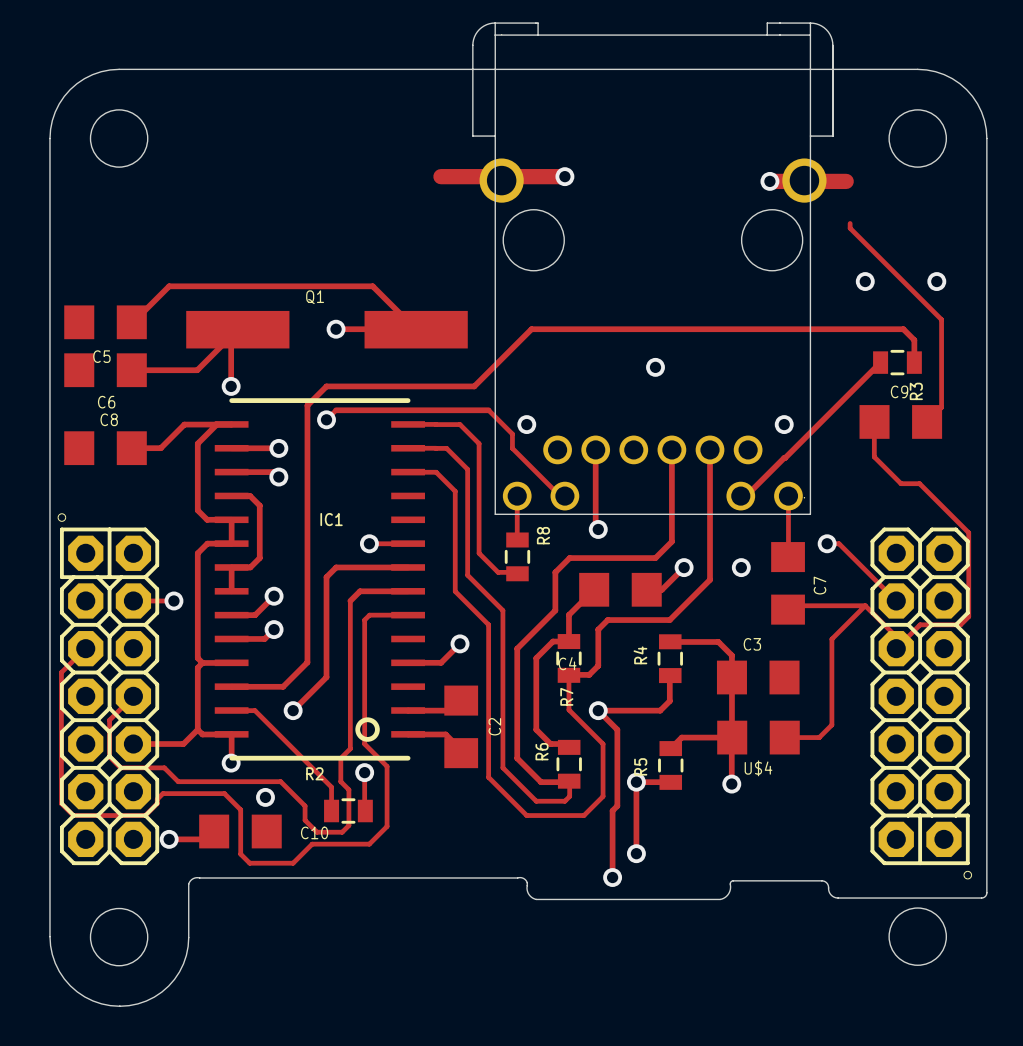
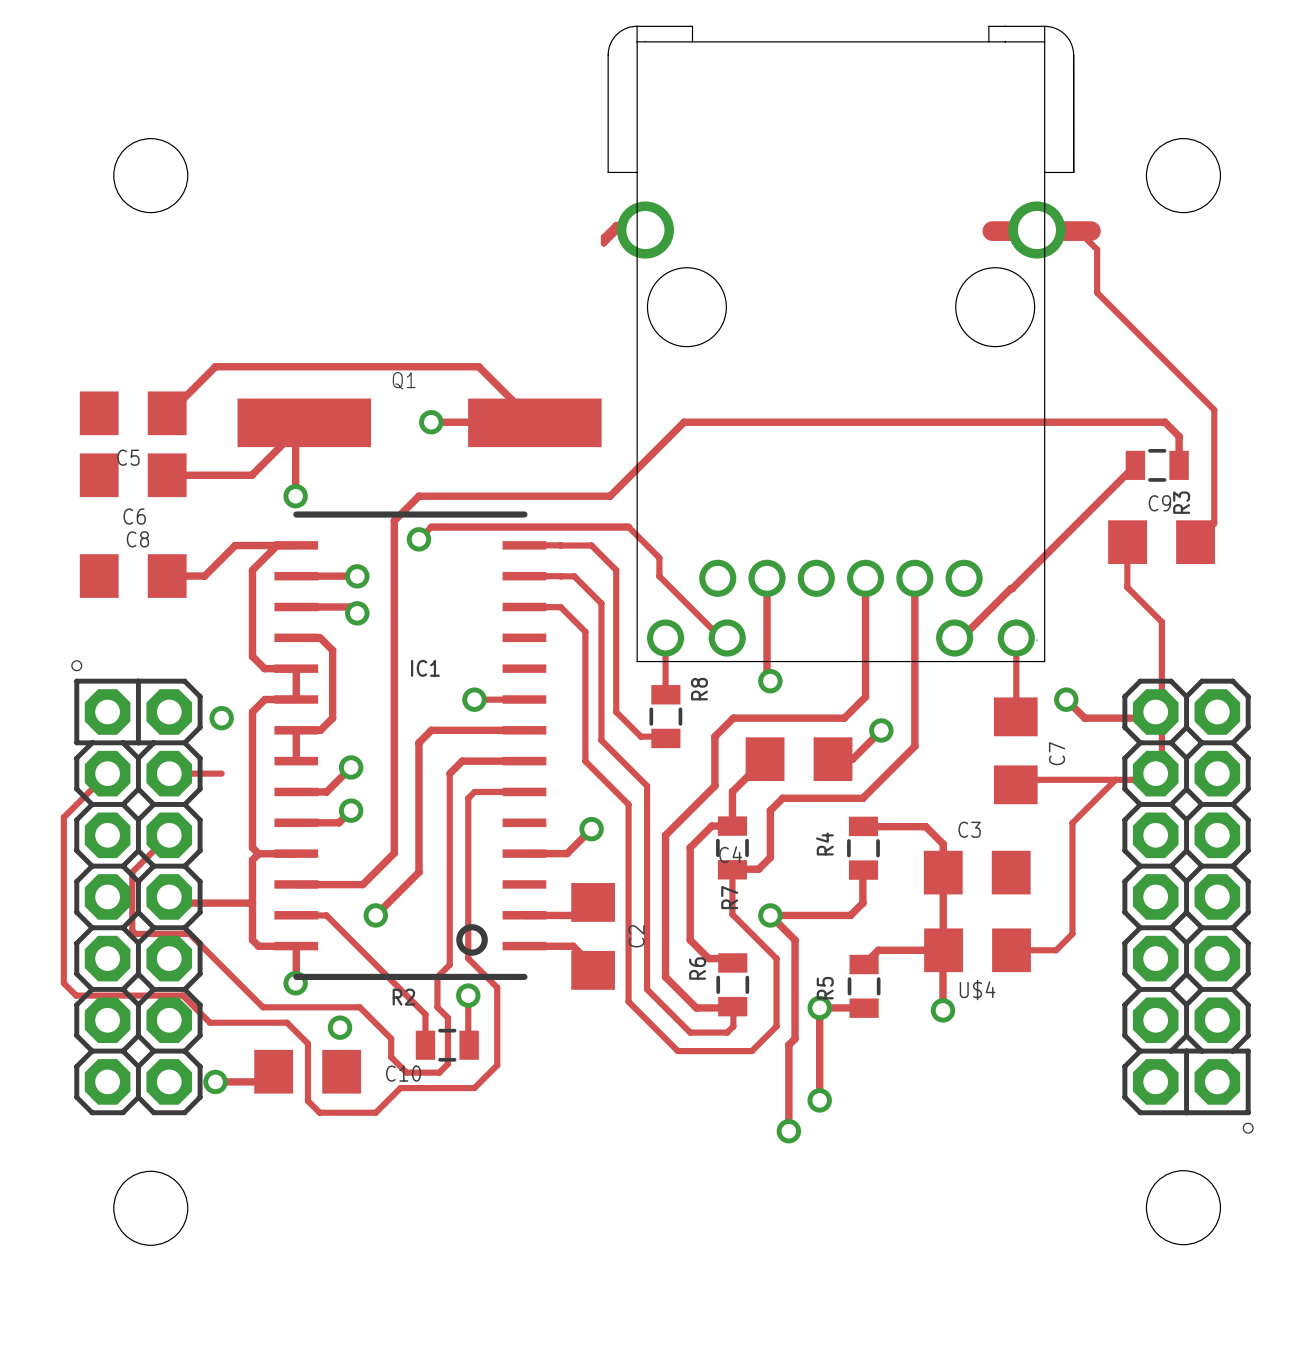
board edge: (119, 69) (917, 69) (944, 74) (966, 89) (981, 112) (986, 138) (986, 892) (985, 896) (838, 898) (831, 895) (827, 884) (822, 880) (733, 880) (730, 882) (728, 894) (720, 899) (536, 899) (528, 894) (526, 881) (520, 877) (196, 877) (188, 884) (188, 937) (186, 955) (174, 979) (161, 992) (137, 1003) (110, 1005) (84, 996) (70, 985) (55, 963) (49, 936) (49, 138) (55, 112) (70, 89) (92, 74) (119, 69) -> none
track: (440, 176) (479, 176) -> (640, 224) (640, 231) (616, 231) (603, 243) (603, 237) (616, 224)
track: (498, 176) (564, 176) -> none
via: (564, 176) -> none
via: (769, 181) -> none
track: (850, 223) (850, 229) -> (1036, 230) (1077, 230) (1097, 249) (1097, 292)
via: (865, 281) -> none
via: (936, 281) -> none
via: (655, 367) -> none
via: (526, 424) -> none
via: (784, 424) -> none
track: (901, 483) (919, 483) (968, 532) (968, 616) (960, 624) (920, 624) (896, 648) (896, 636) (865, 605) -> (1161, 621) (1161, 753) (1135, 779) (1115, 779)
track: (827, 543) (839, 543) (896, 600) -> (1066, 699) (1084, 718) (1131, 718)
via: (741, 567) -> none
via position: (173, 600) -> (221, 718)
track: (85, 648) (61, 672) (61, 803) (73, 815) (145, 815) (157, 803) (157, 799) (164, 793) -> (101, 779) (63, 817) (63, 983) (76, 995) (182, 995) (209, 1022)
track: (133, 696) (109, 720) (109, 756) (120, 767) (164, 767) (178, 781) (205, 781) -> (163, 841) (132, 872) (132, 930) (135, 933) (189, 933) (262, 1007)
track: none -> (163, 903) (252, 903)
track: (197, 729) (183, 744) (133, 744) -> none

